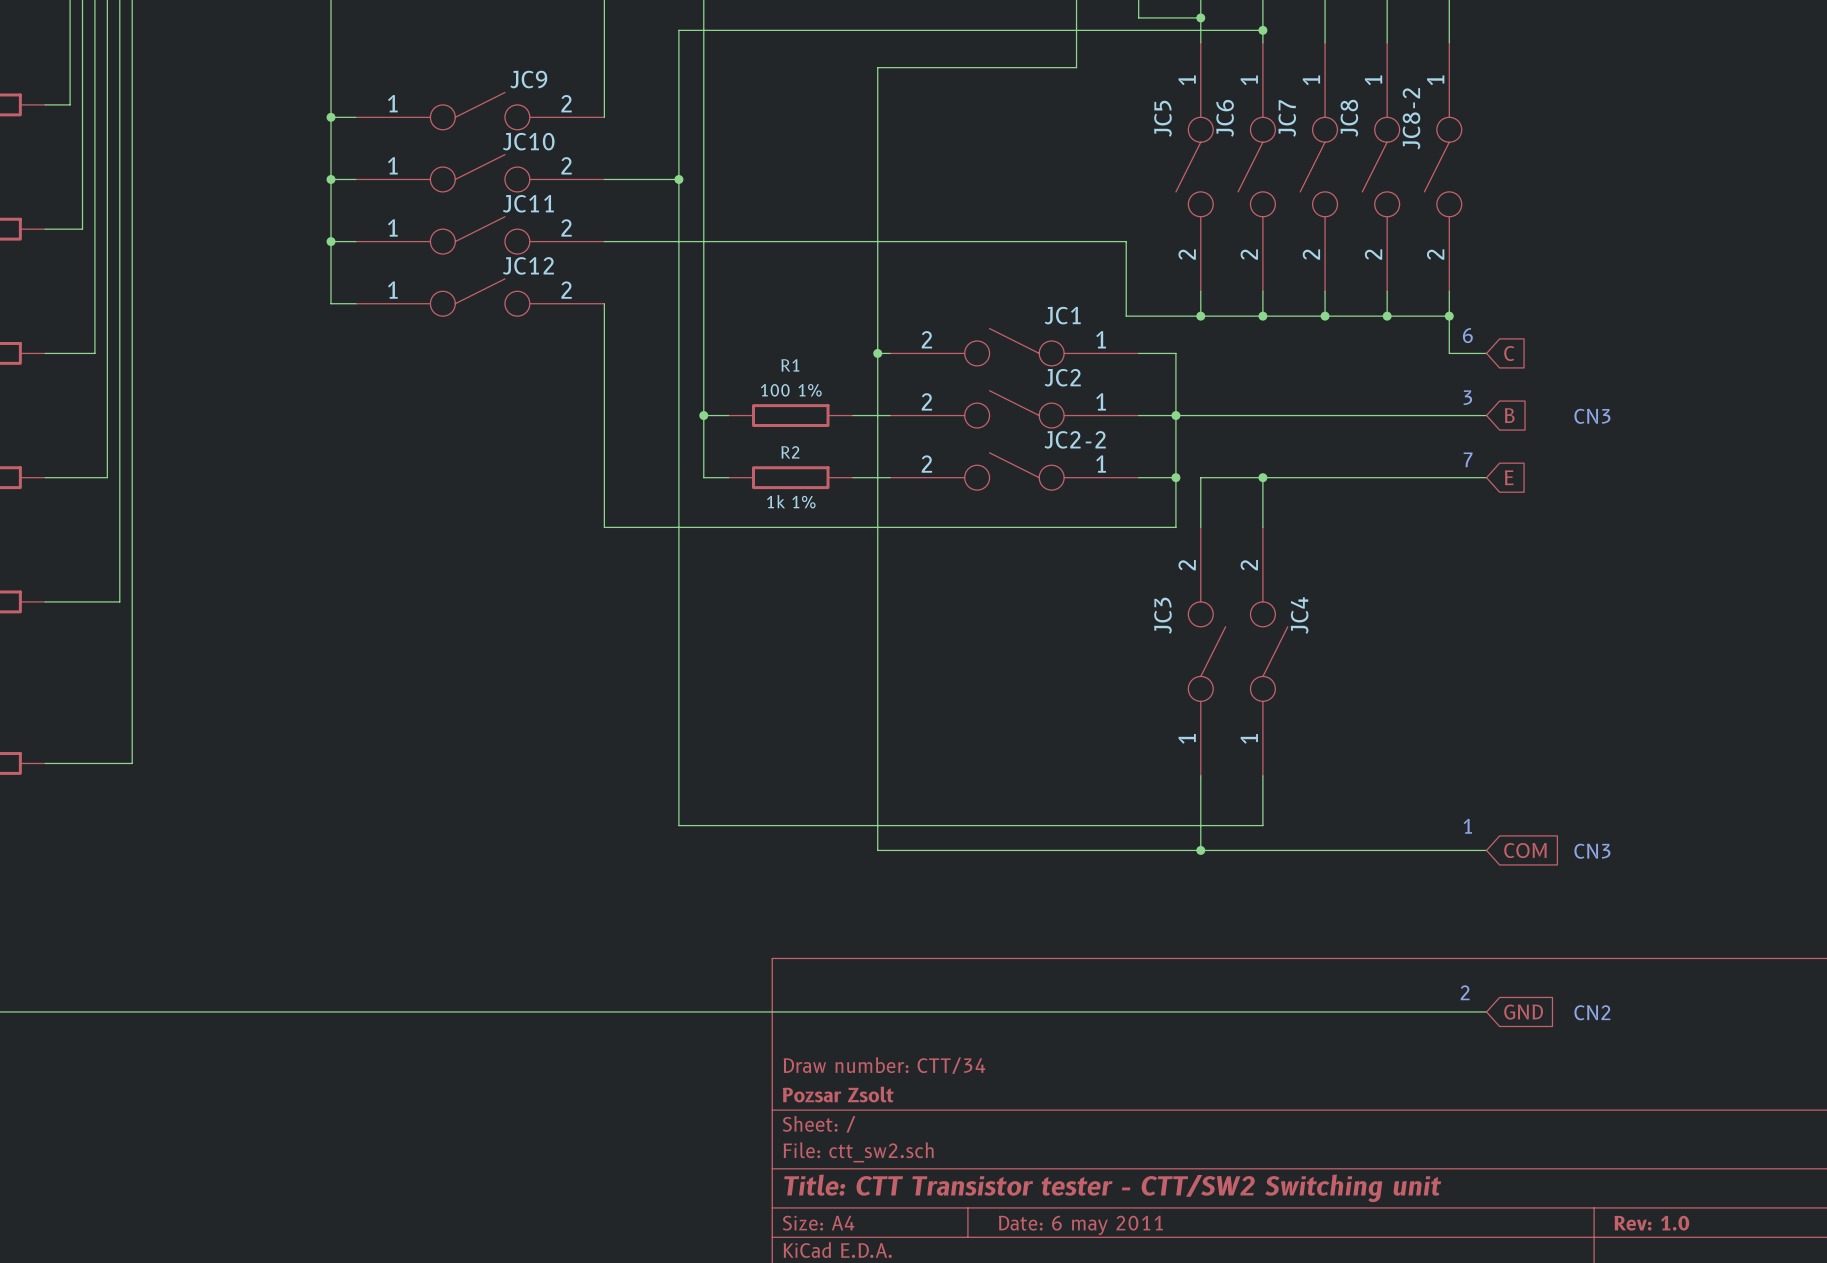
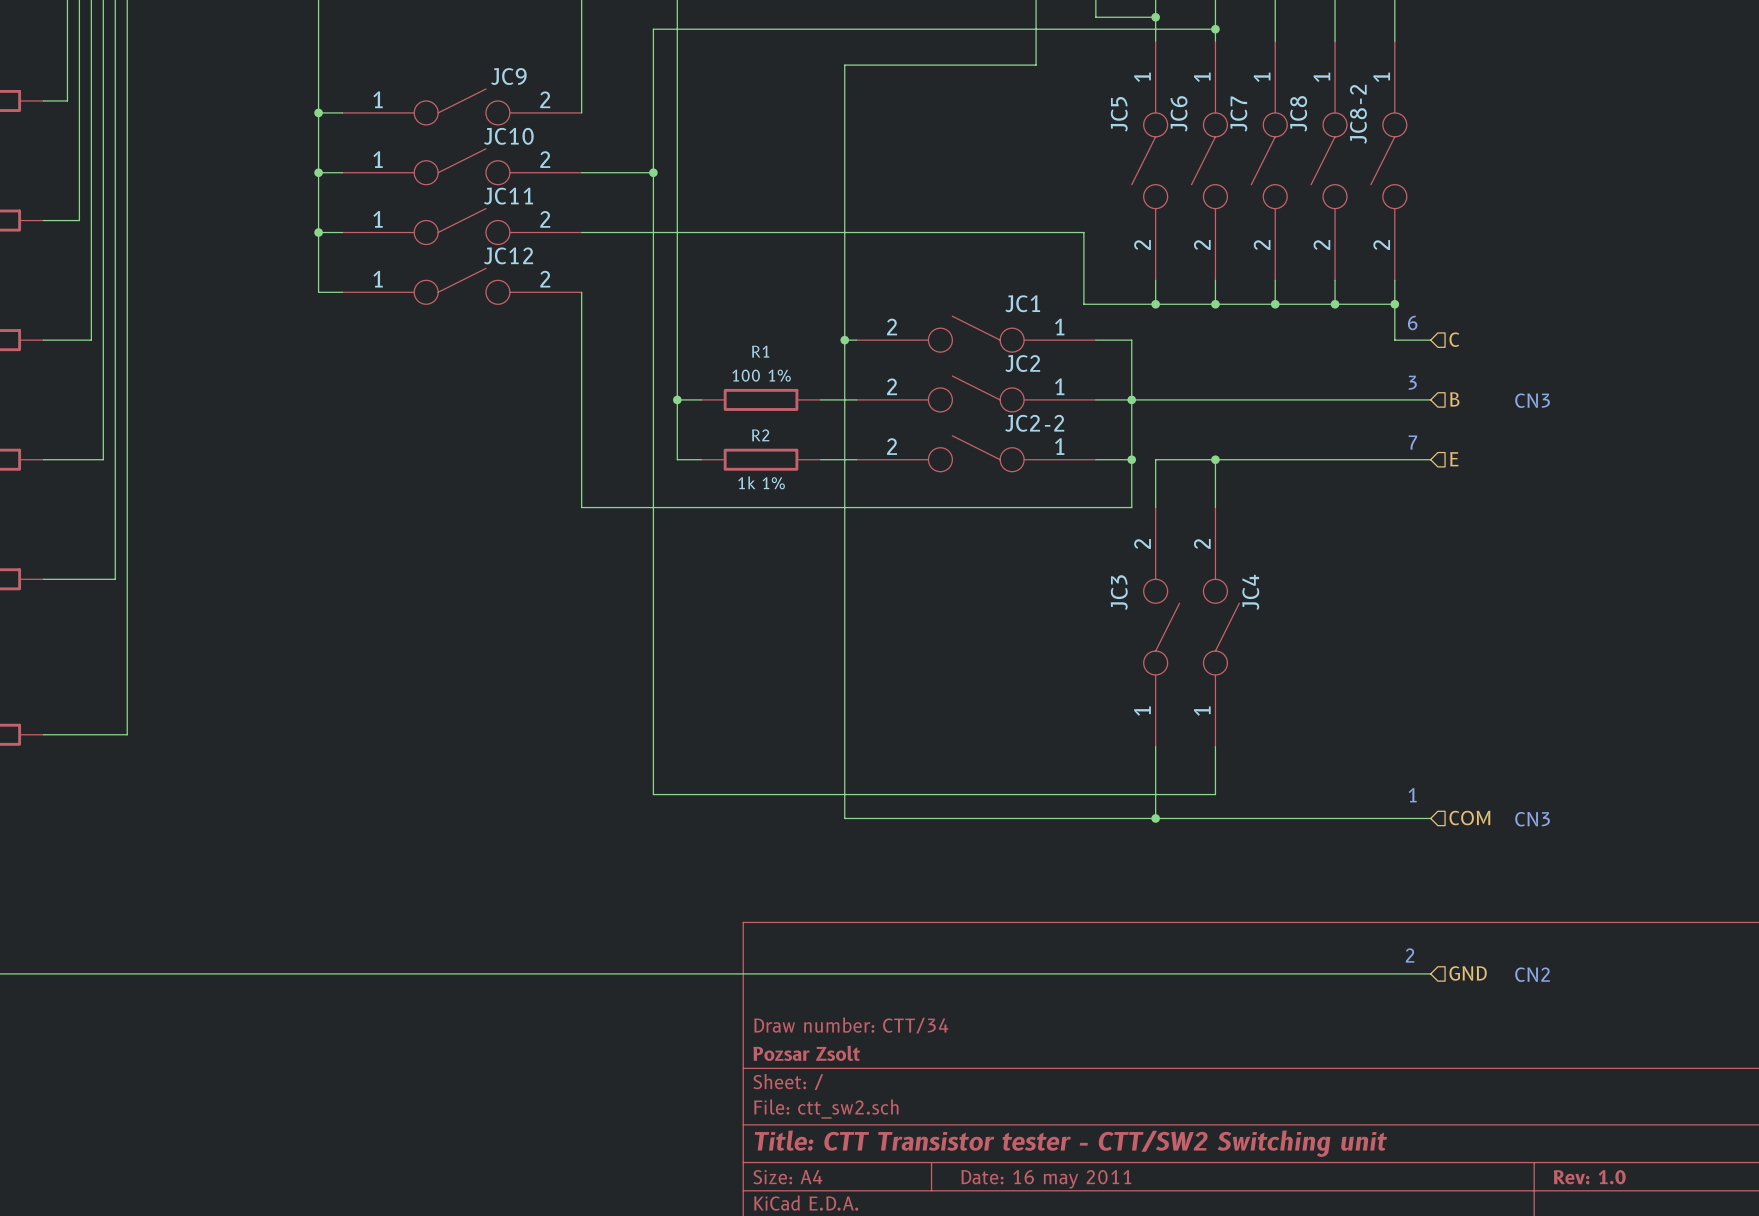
hierarchical label: none -> C (1454, 339)
global label: C (1509, 353) -> none
global label: B (1509, 415) -> none
hierarchical label: none -> B (1454, 399)
global label: E (1509, 477) -> none
hierarchical label: none -> E (1454, 459)
hierarchical label: none -> COM (1469, 818)
global label: COM (1525, 850) -> none
hierarchical label: none -> GND (1468, 973)
global label: GND (1523, 1012) -> none
title block: Date: 6 may 2011 (1080, 1225) -> Date: 16 may 2011 (1046, 1179)

